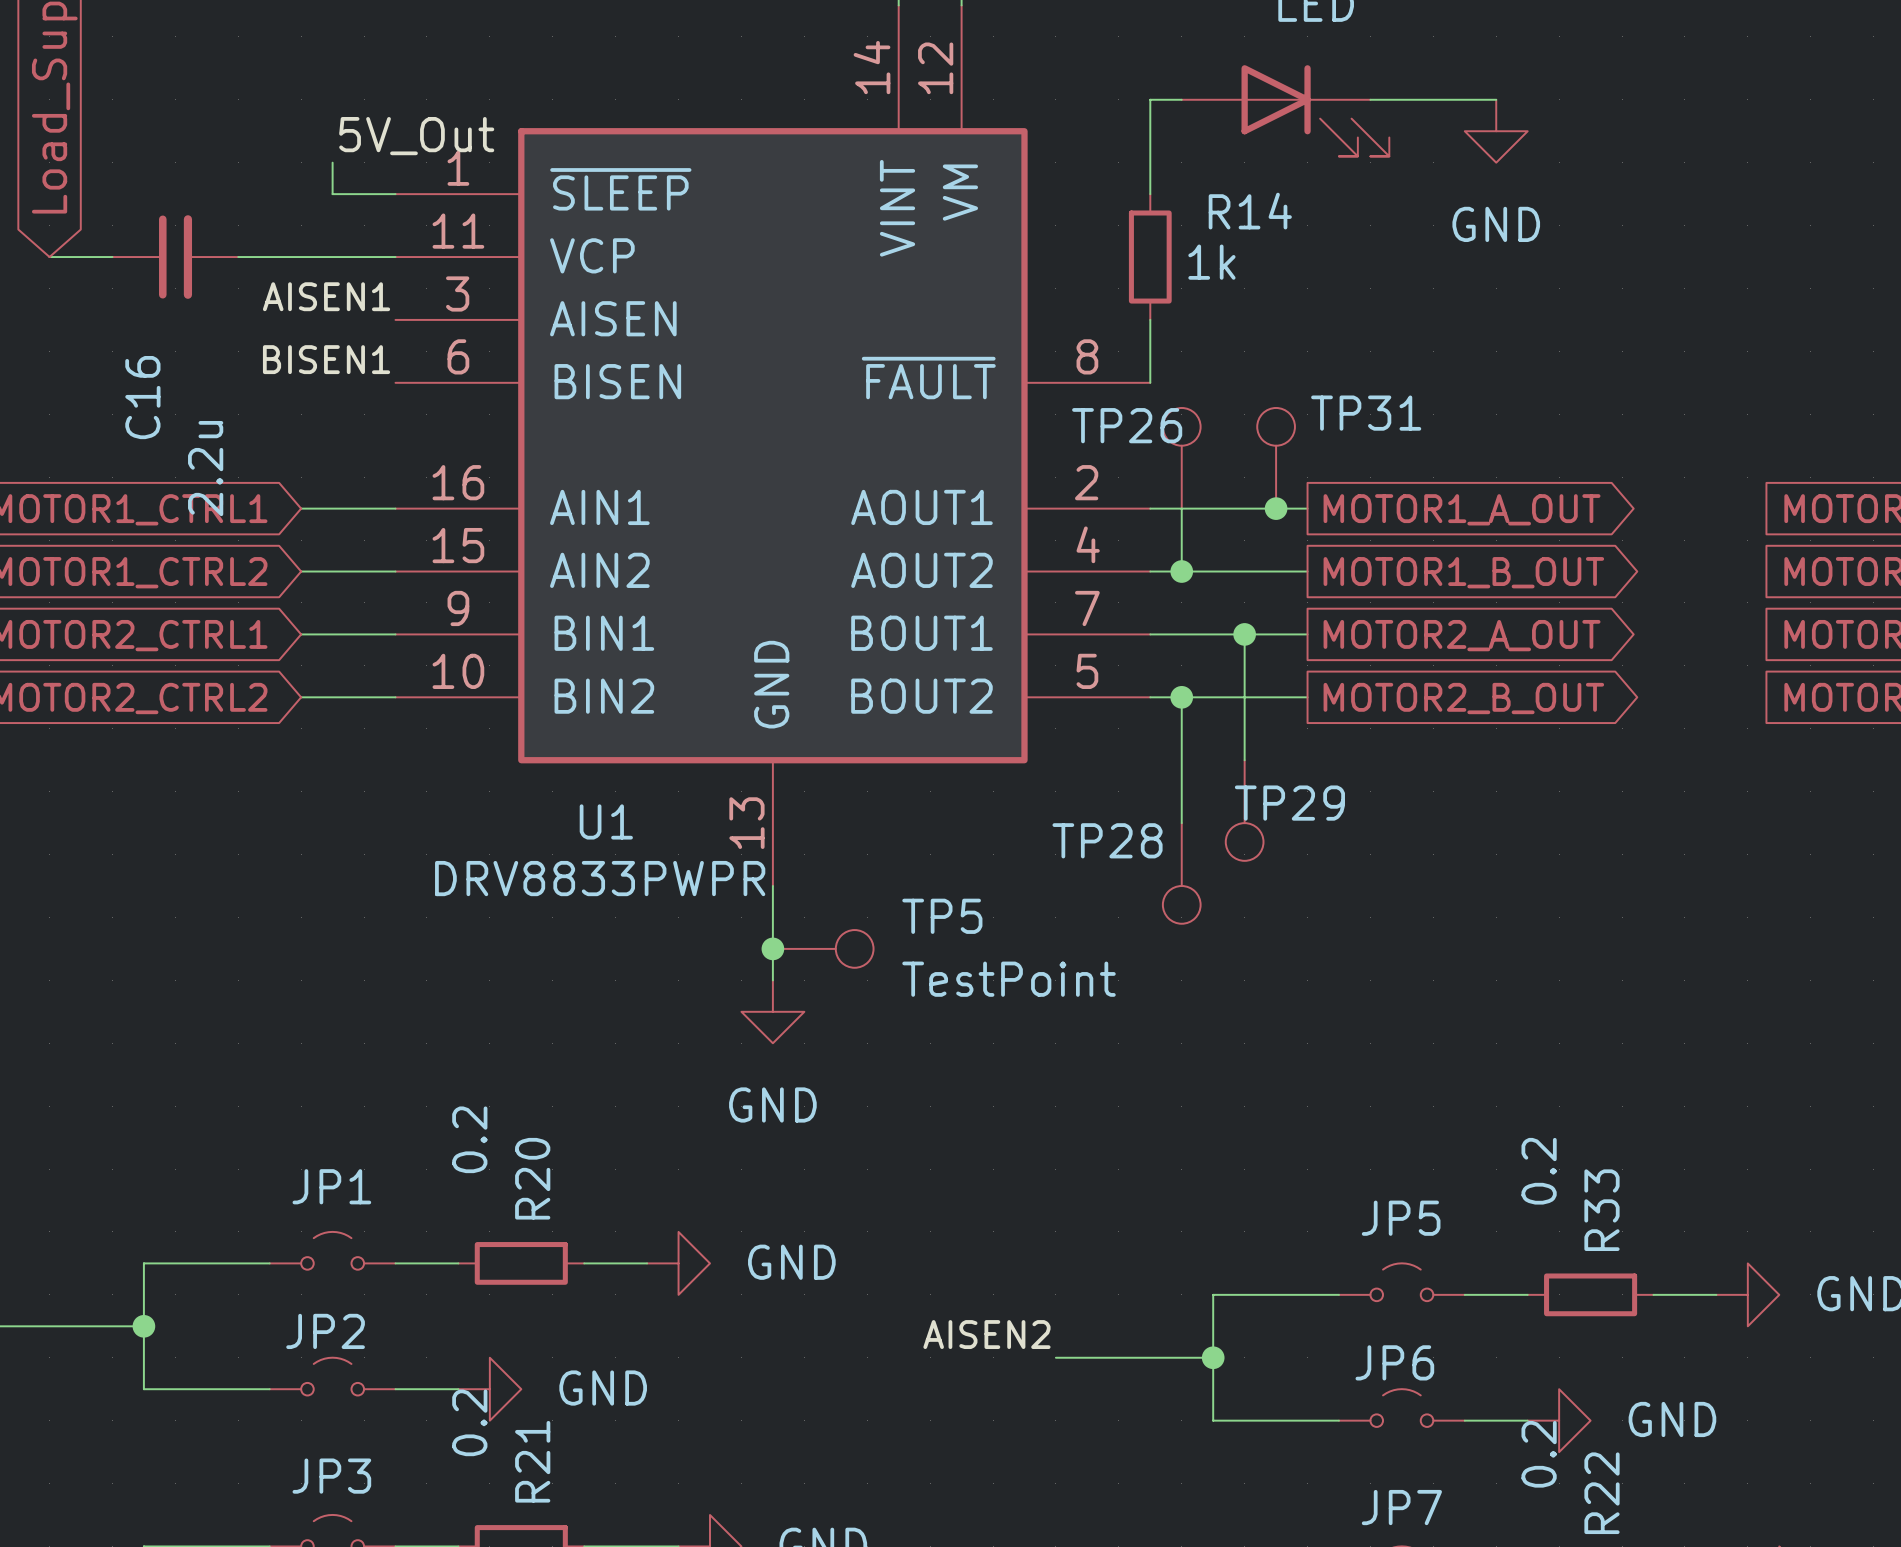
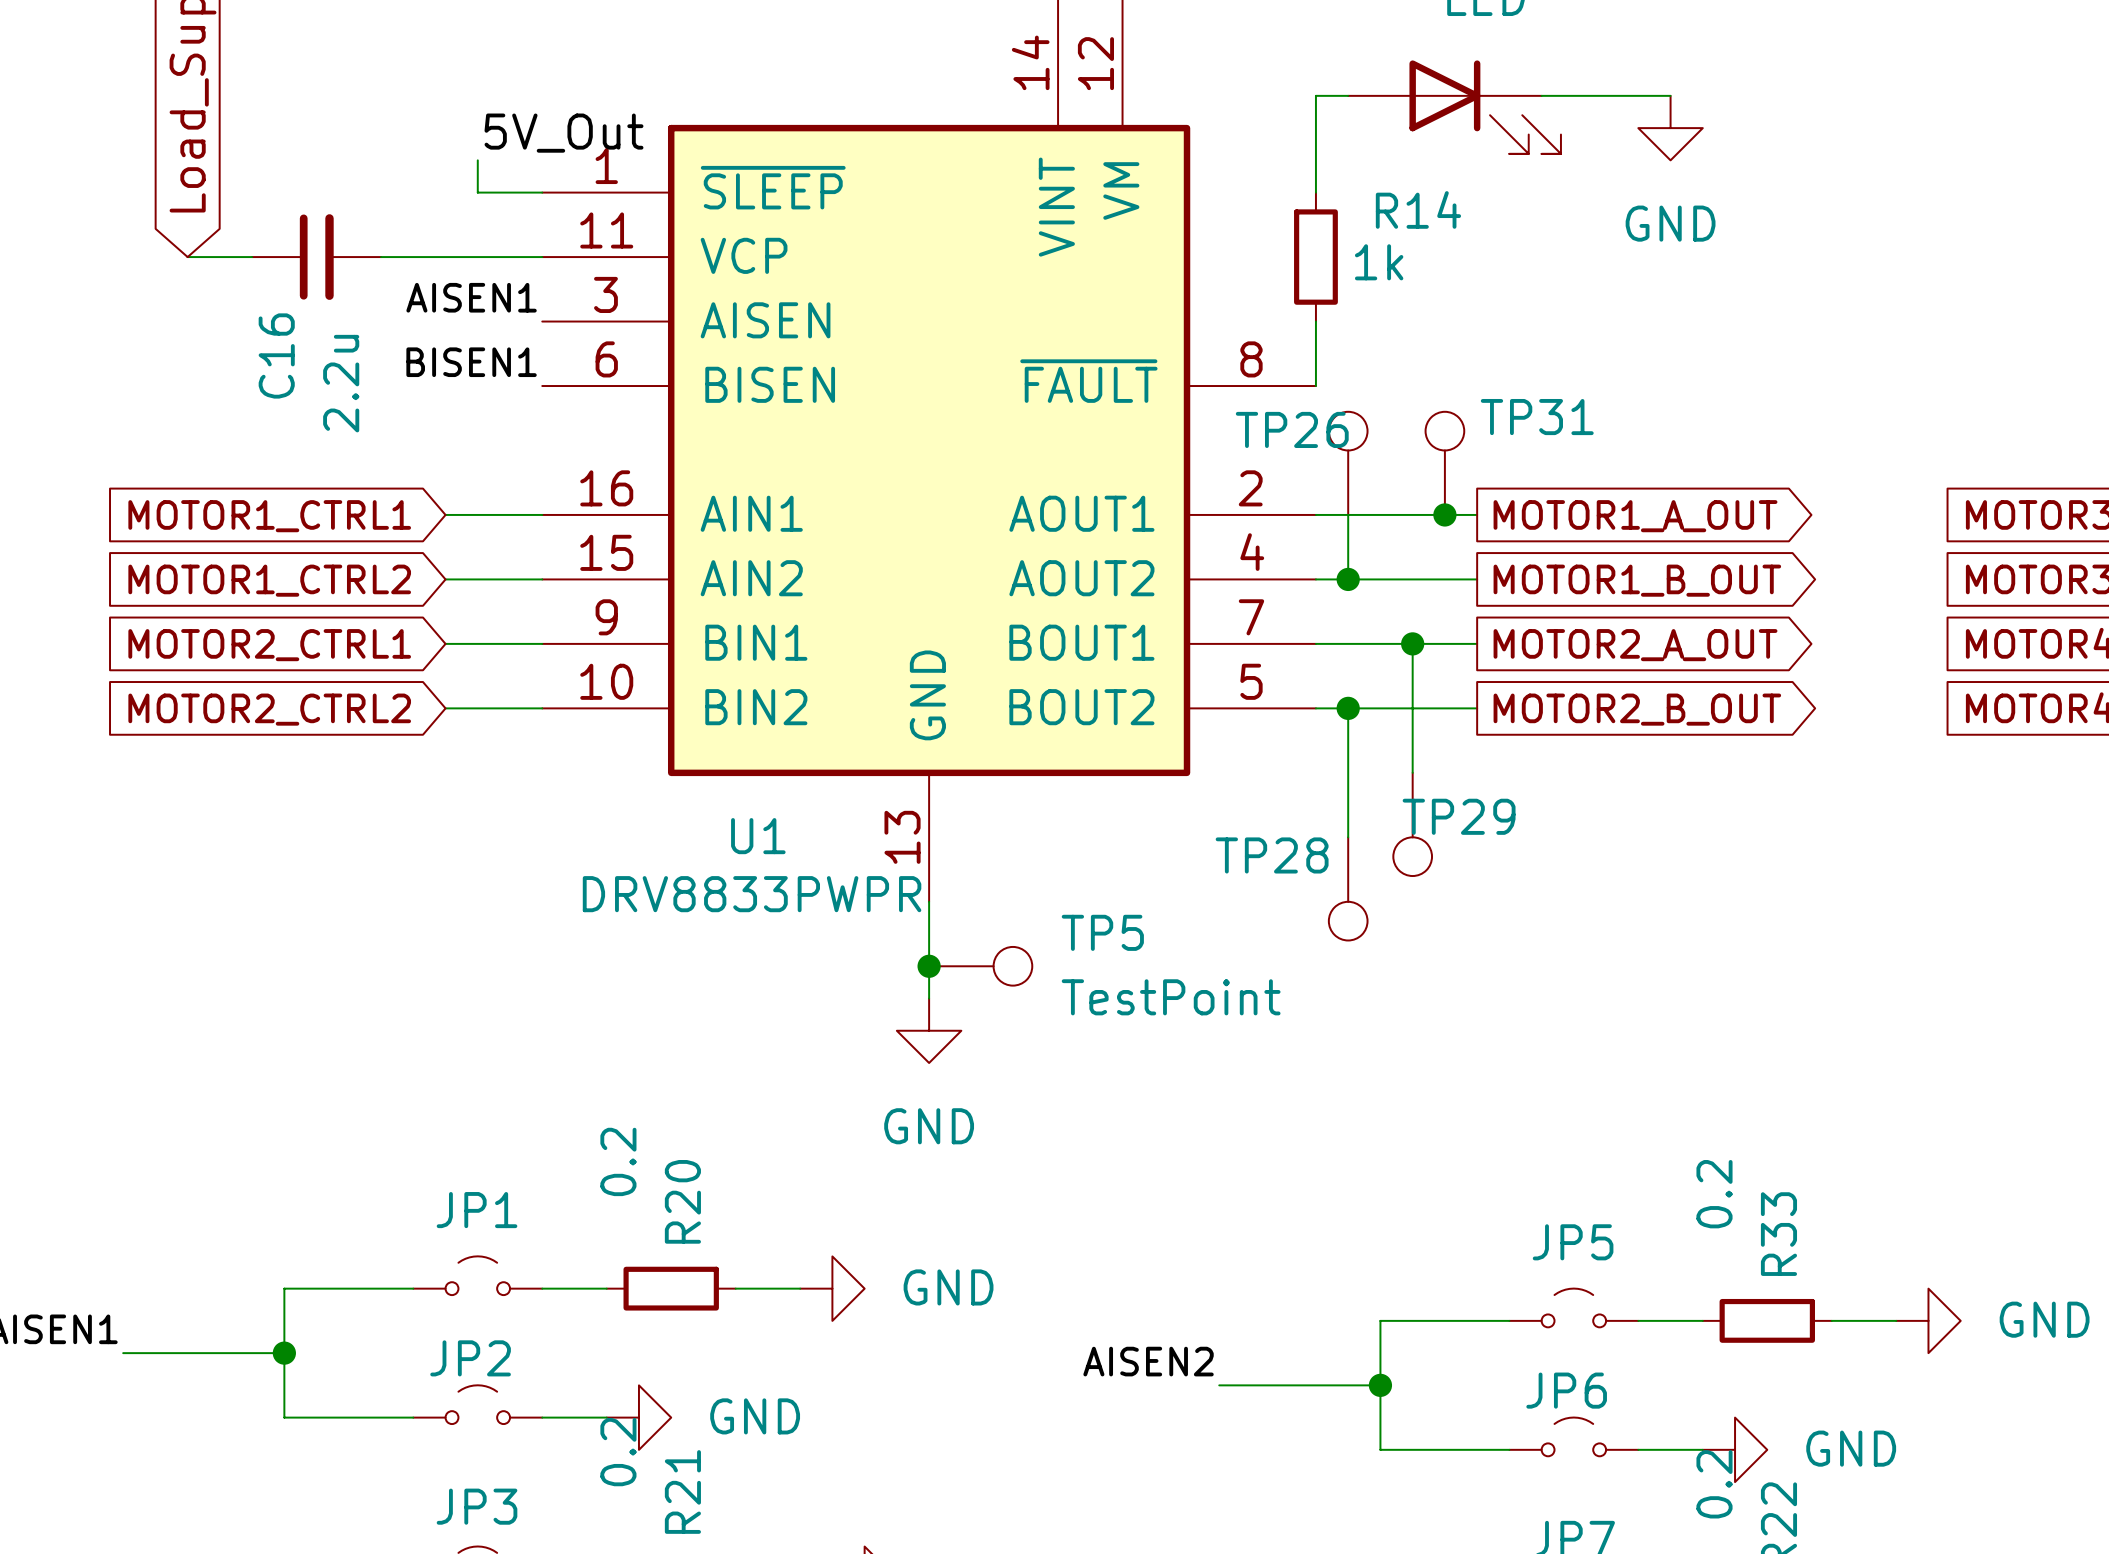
C16 name position: C16 (142, 397) -> C16 (276, 355)
C16 value position: 2.2u (205, 468) -> 2.2u (341, 383)

